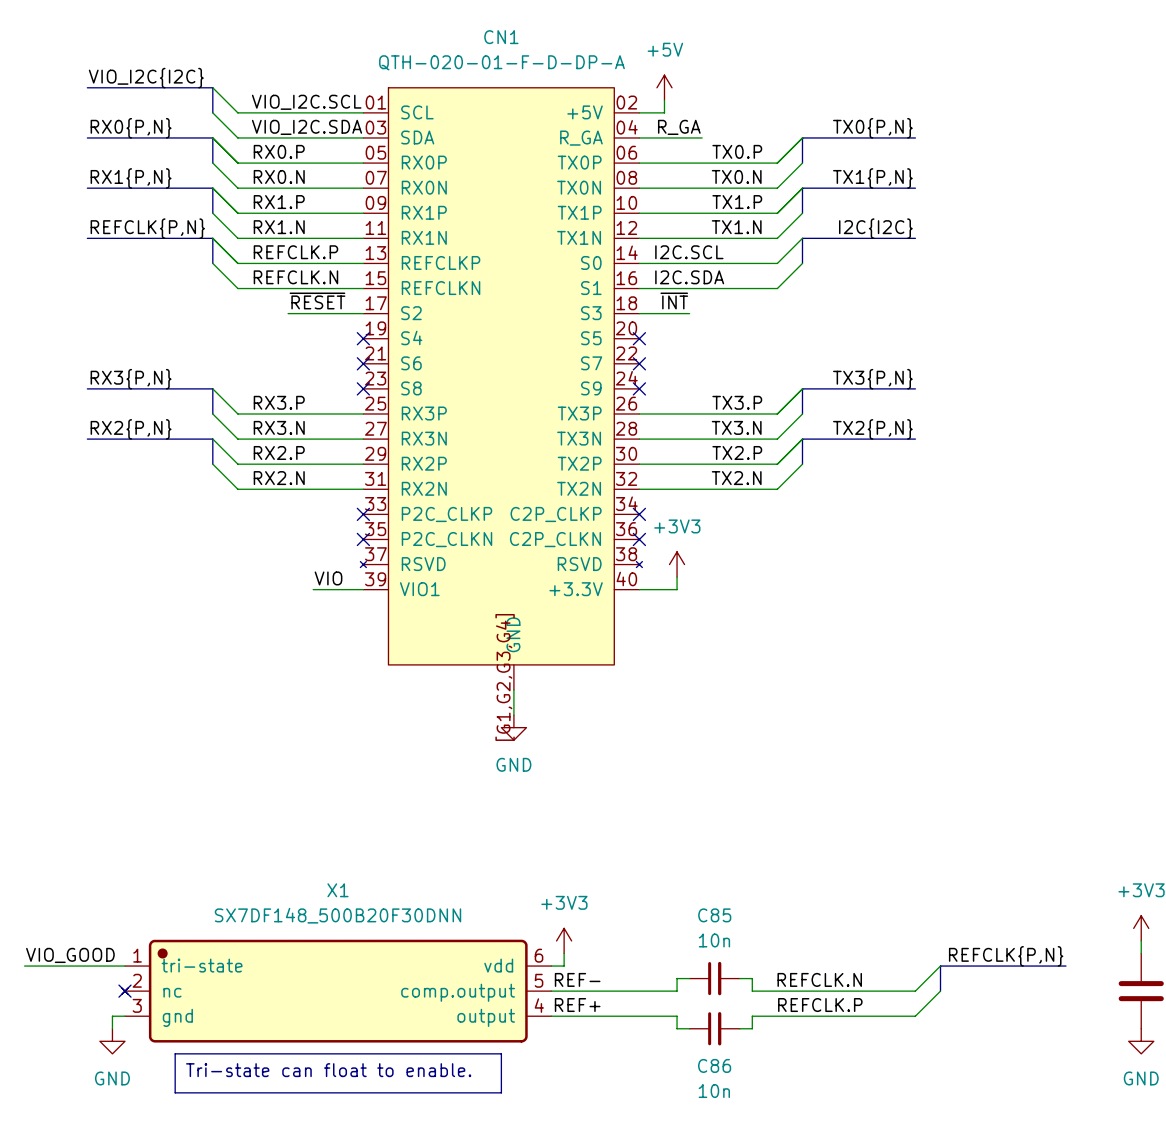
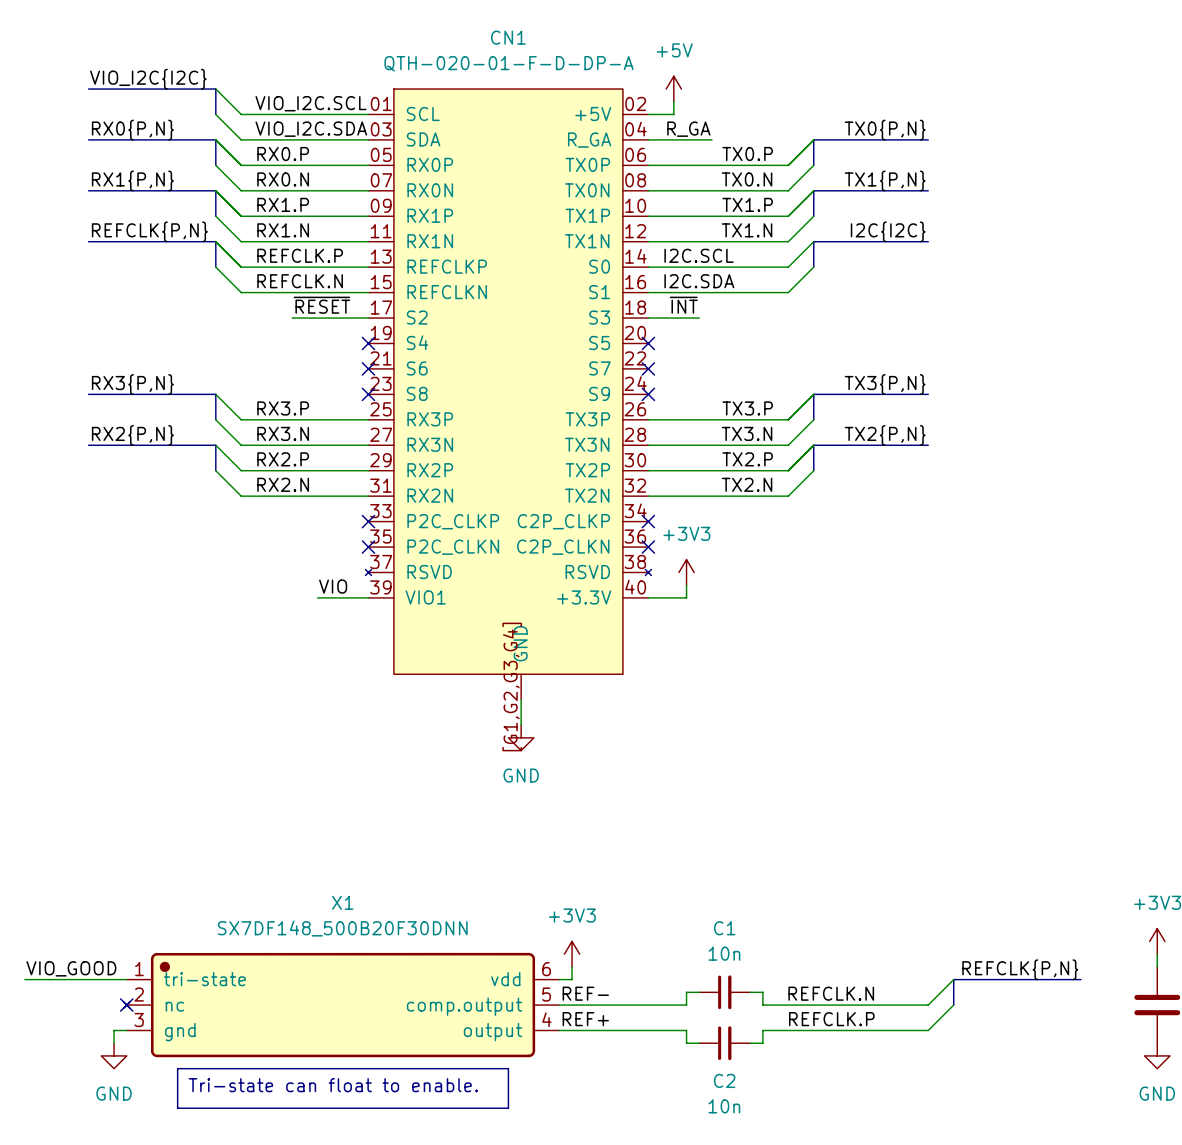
C85 name: C85 (714, 915) -> C1 (724, 928)
C86 name: C86 (714, 1065) -> C2 (724, 1080)

